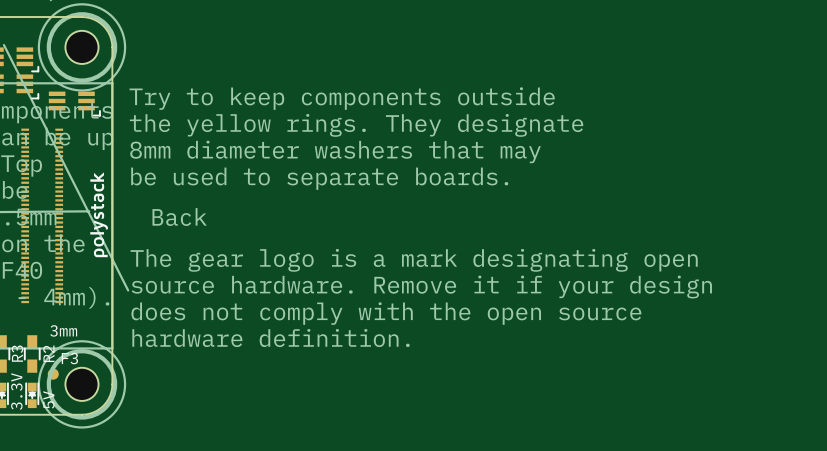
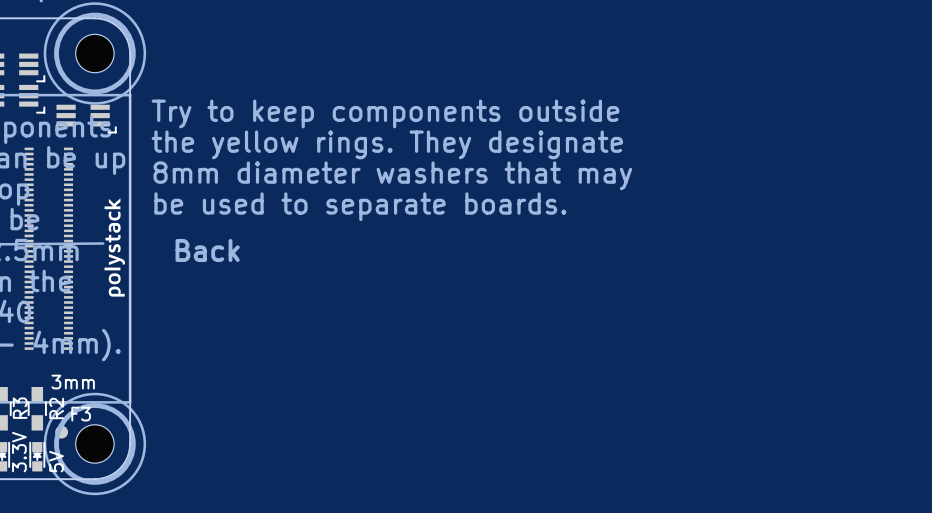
line: (3, 45) (128, 290) -> none
text: The gear logo is a mark designating open (414, 260) -> none
text: source hardware. Remove it if your design (421, 287) -> none
text: does not comply with the open source (386, 313) -> none
text: hardware definition. (270, 338) -> none

